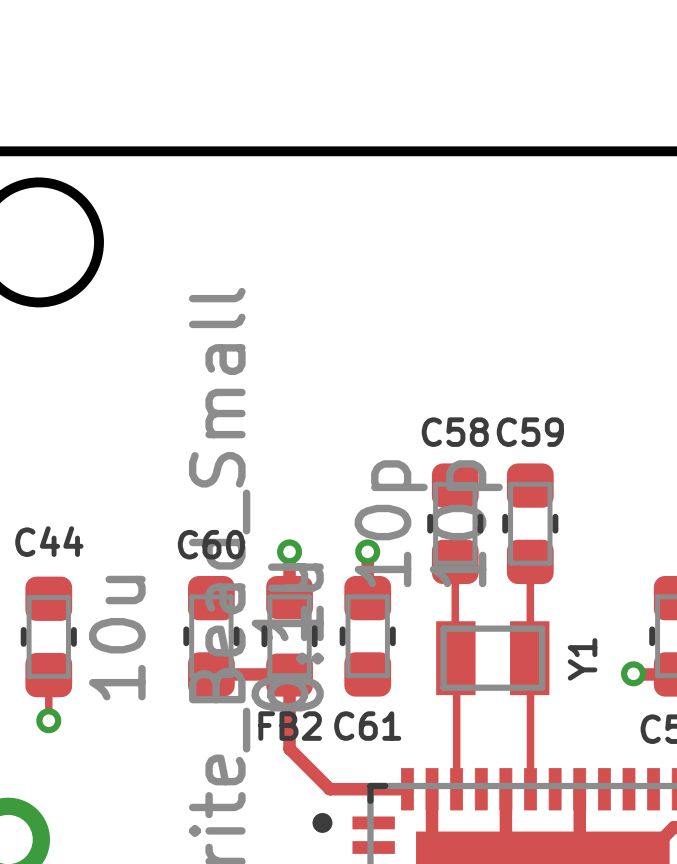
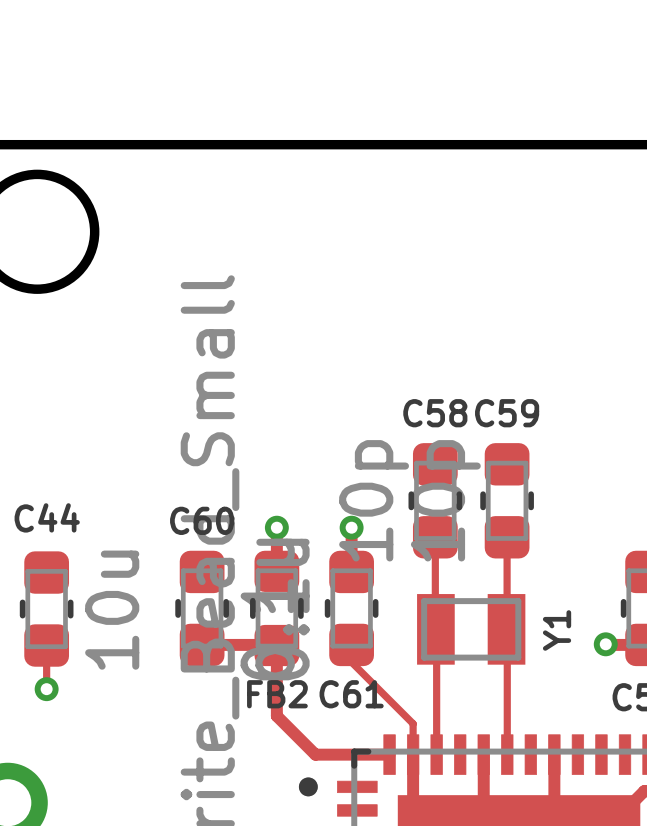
top track: none -> (351, 644) (351, 662) (413, 723) (413, 754)

